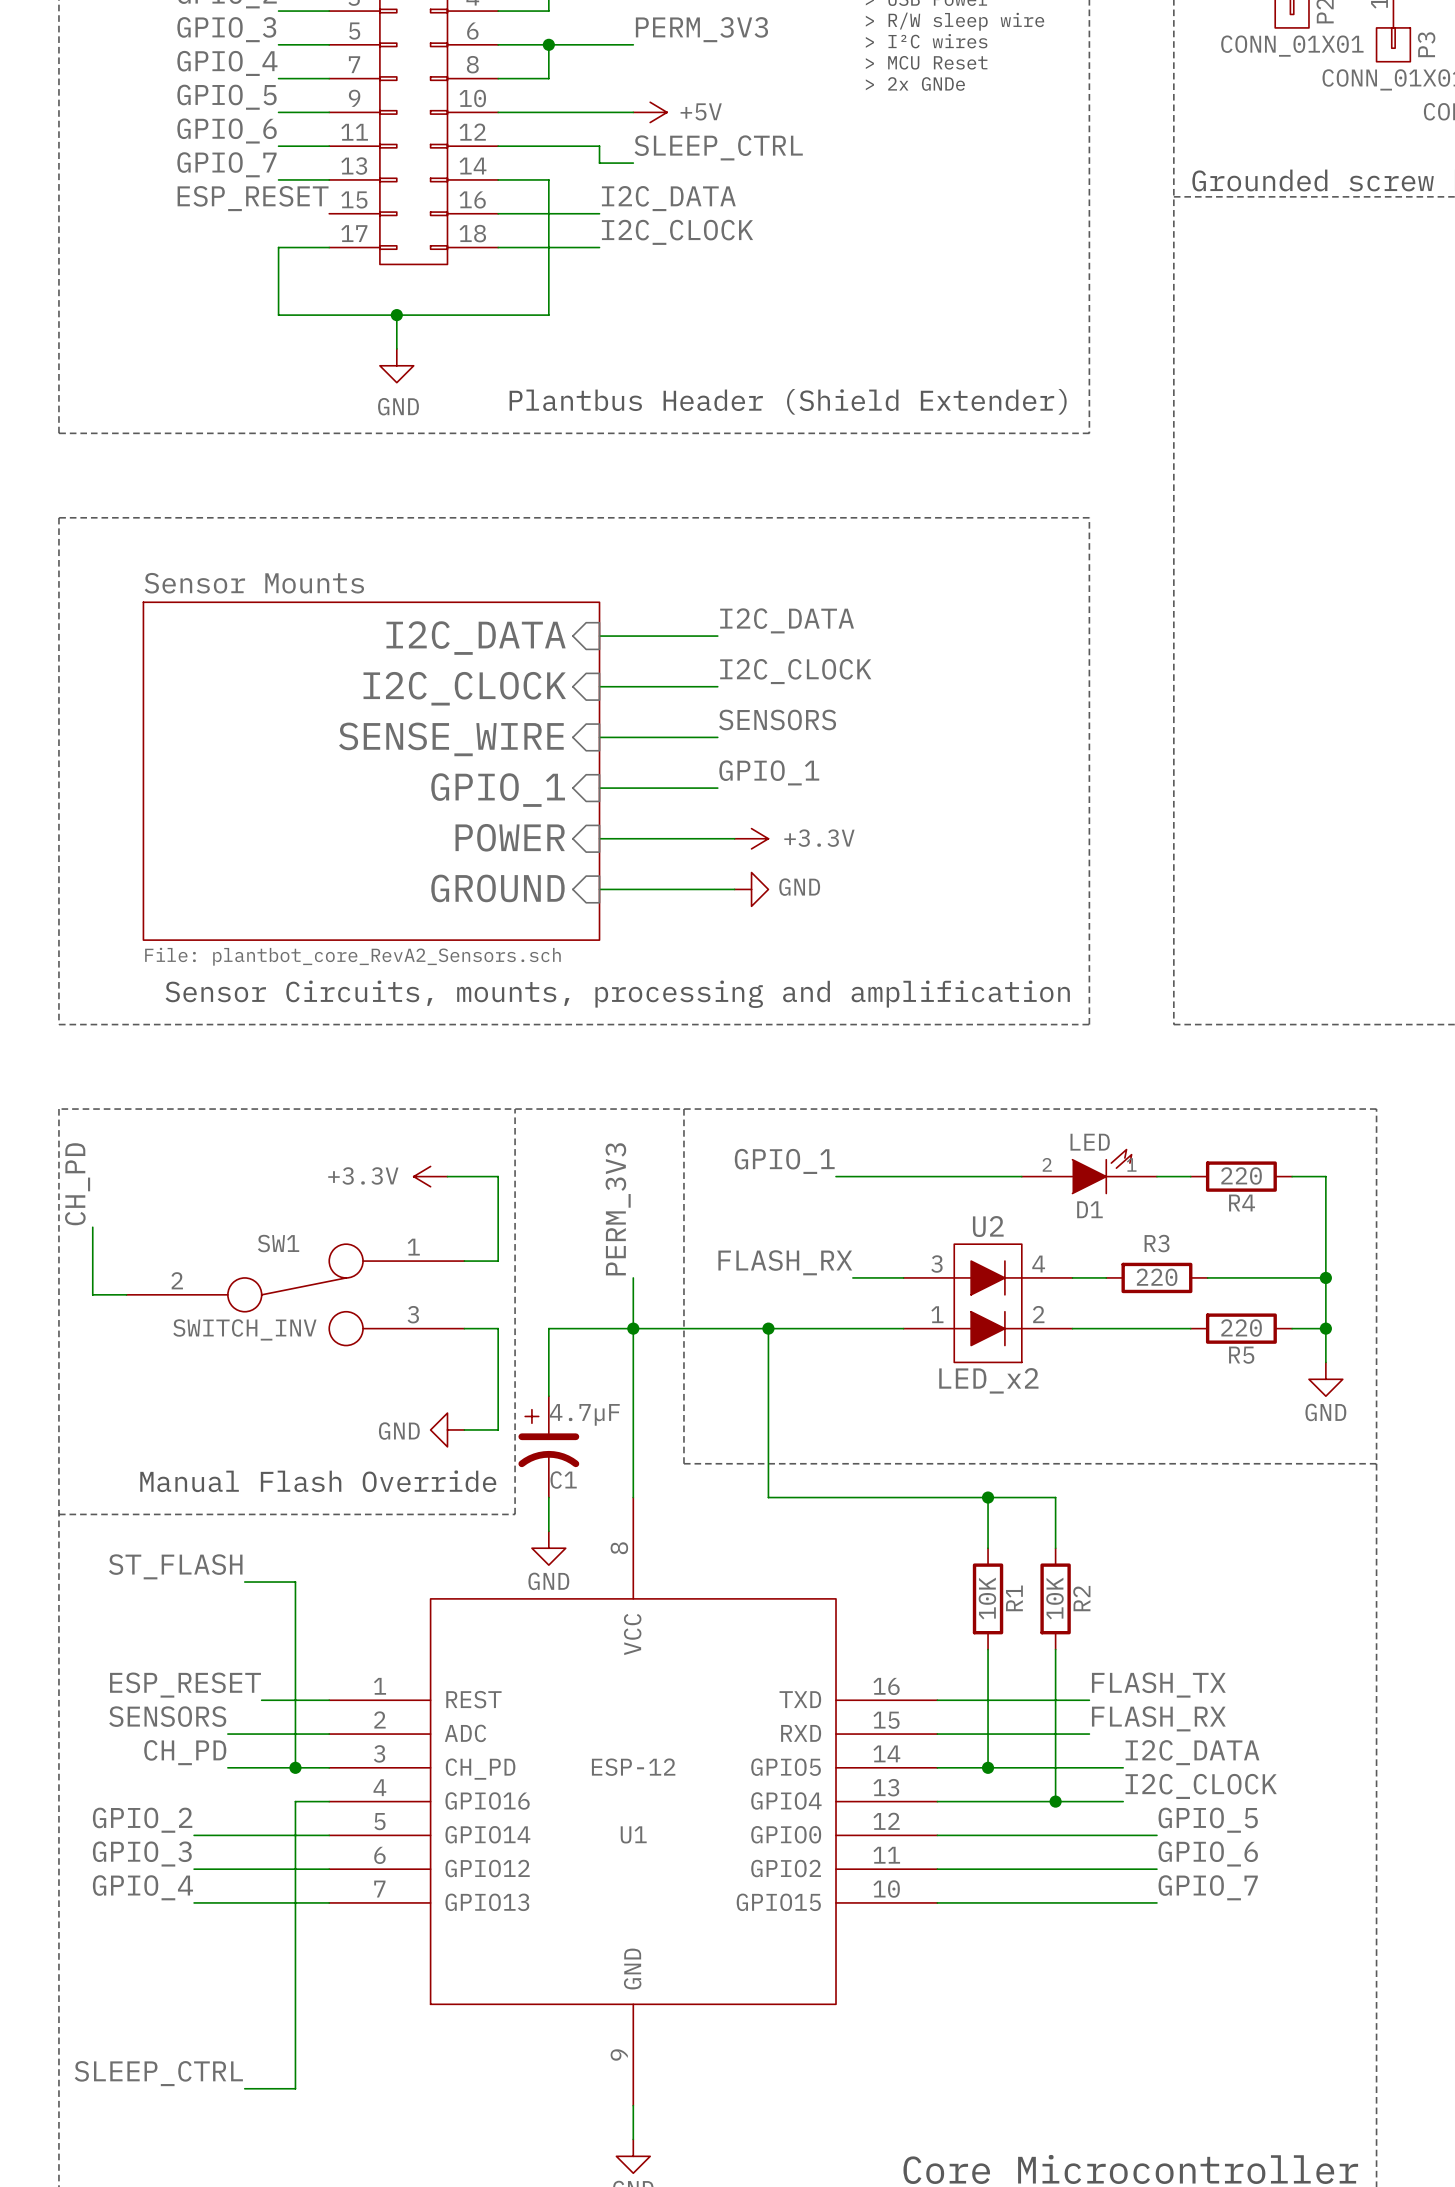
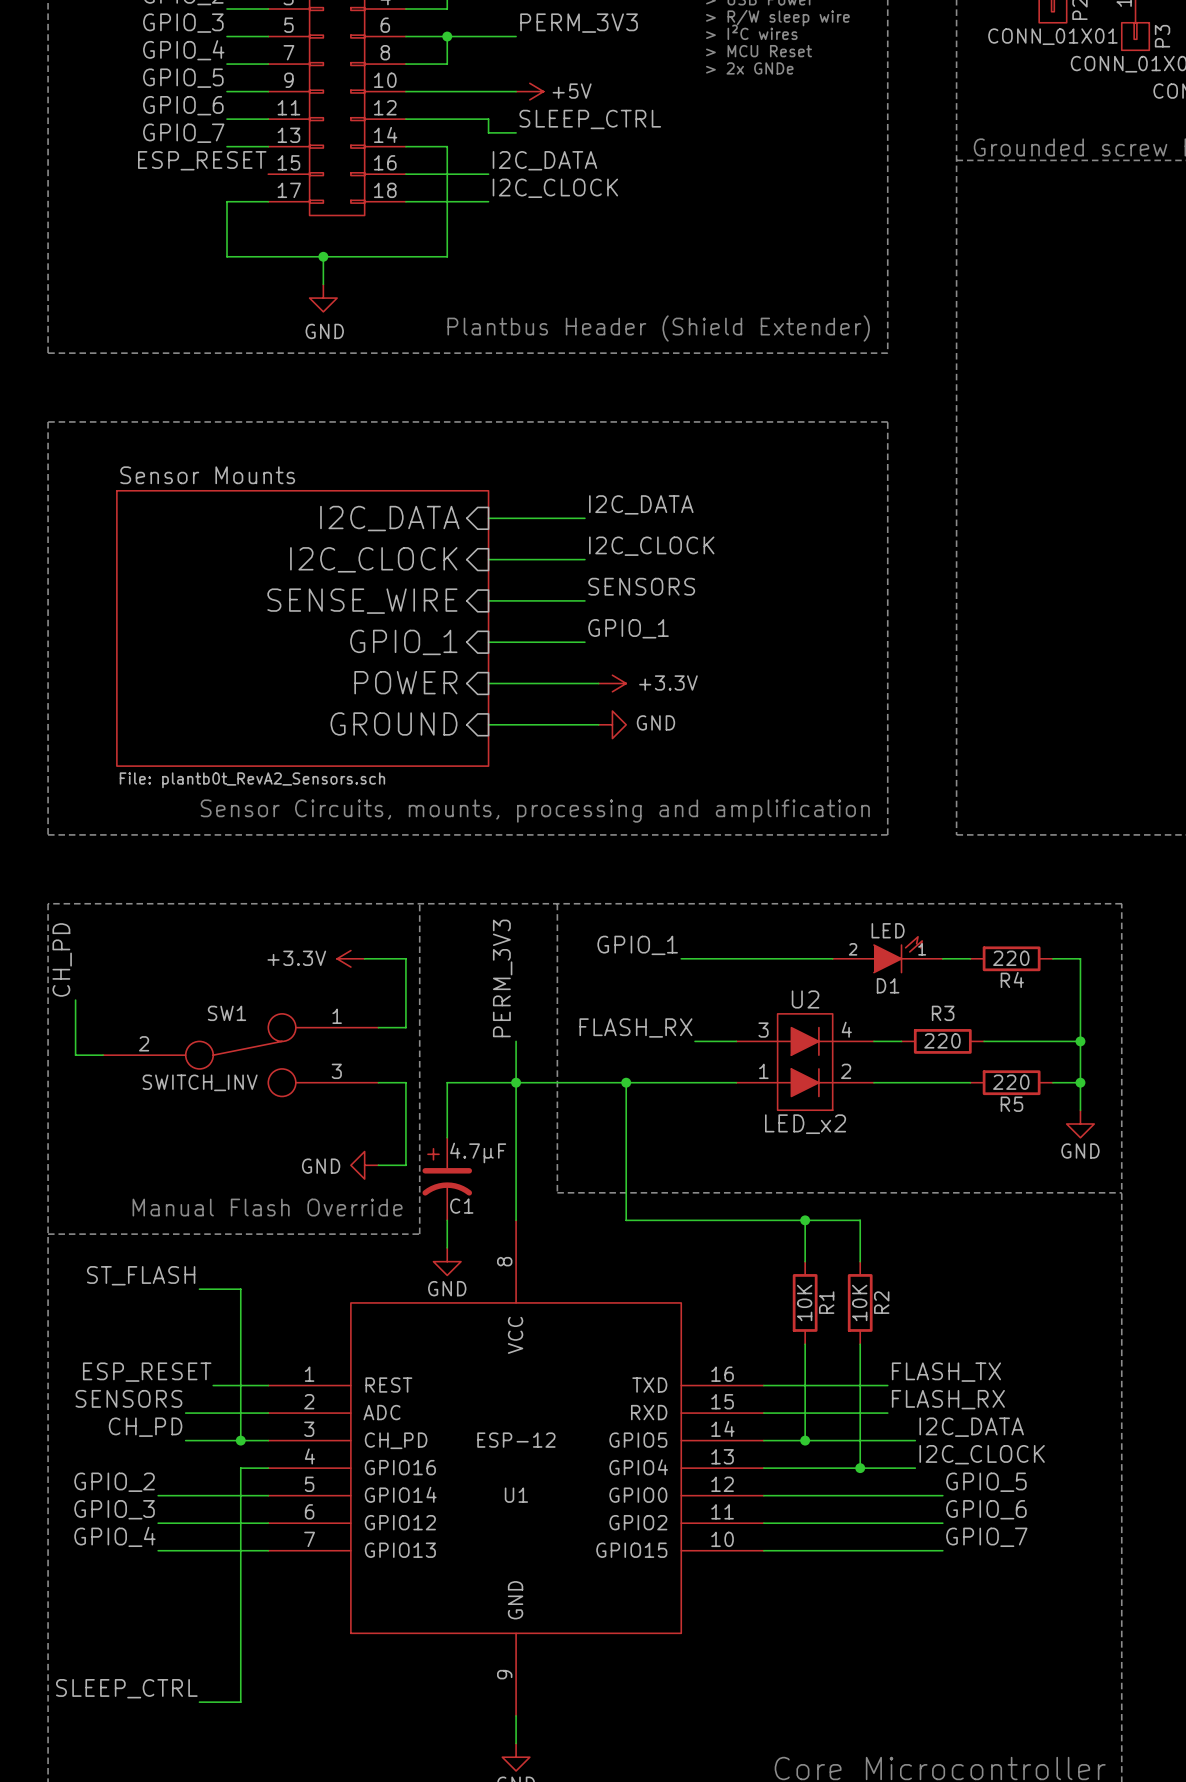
sheet Sensor Mounts value: File: plantbot_core_RevA2_Sensors.sch (352, 956) -> File: plantb0t_RevA2_Sensors.sch (252, 780)

